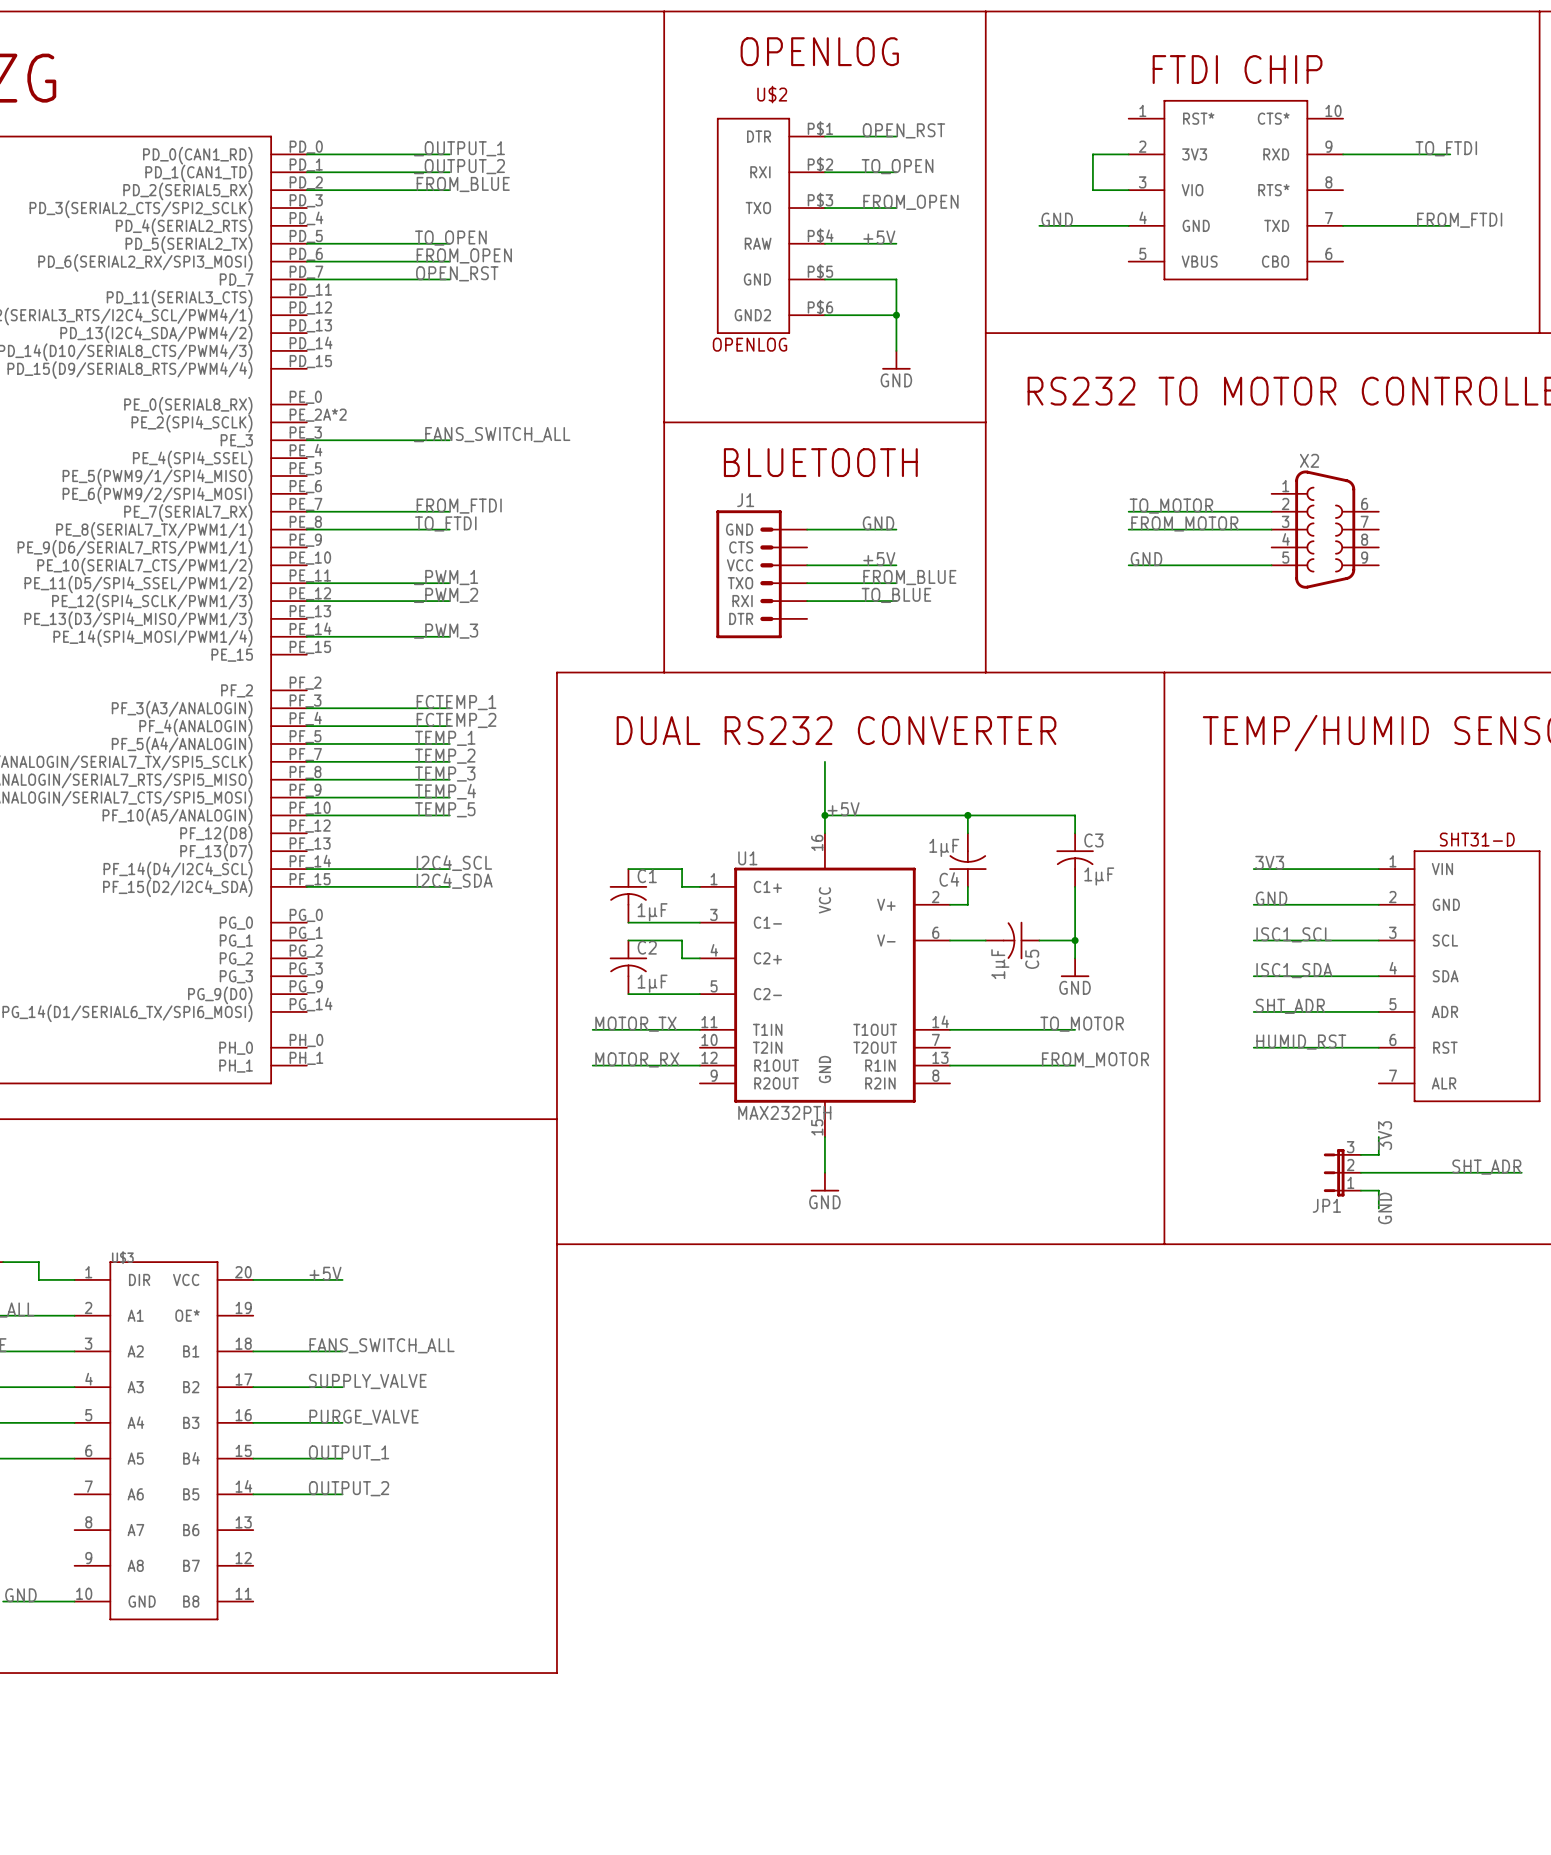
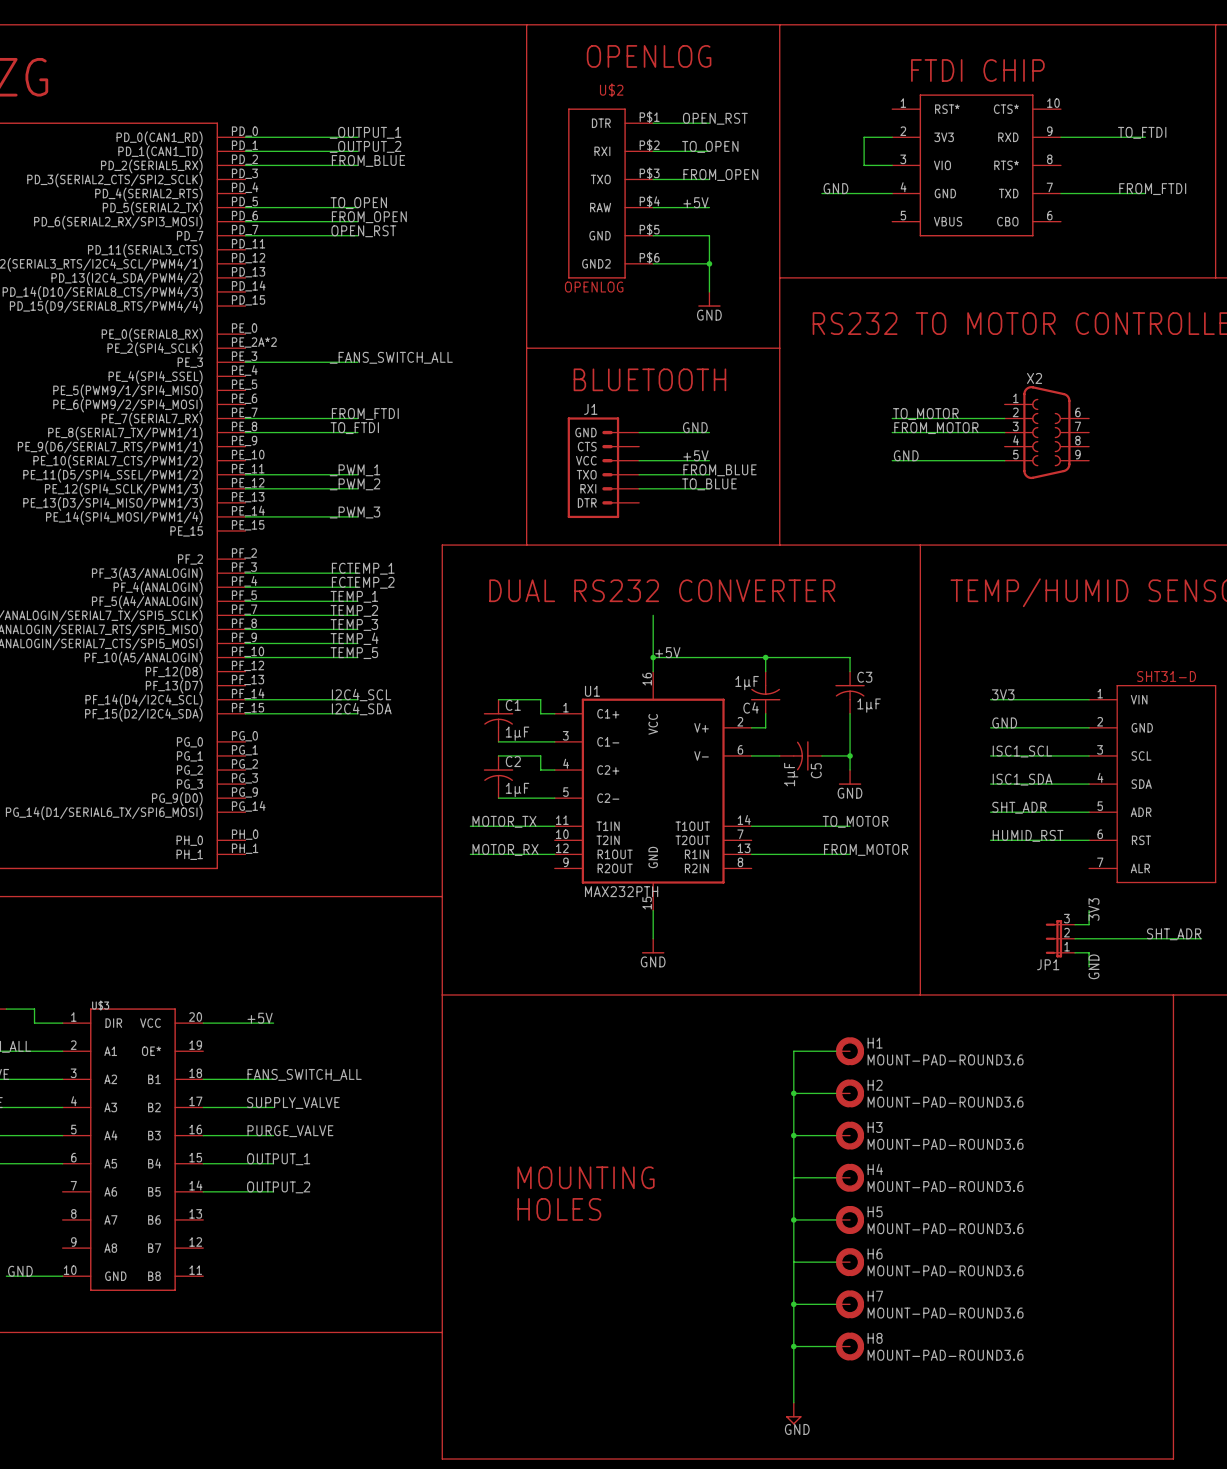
line: none -> (1173, 994) (1173, 1459) (442, 1459) (442, 1332)
wire: none -> (835, 1051) (793, 1051) (793, 1402)
H1: none -> MOUNT-PAD-ROUND3.6 (850, 1051)
wire: none -> (793, 1093) (835, 1093)
junction: none -> (793, 1093)
H2: none -> MOUNT-PAD-ROUND3.6 (850, 1093)
wire: none -> (793, 1135) (835, 1135)
junction: none -> (793, 1135)
H3: none -> MOUNT-PAD-ROUND3.6 (850, 1135)
text: none -> MOUNTING (586, 1177)
wire: none -> (793, 1177) (835, 1177)
H4: none -> MOUNT-PAD-ROUND3.6 (850, 1177)
text: none -> HOLES (559, 1209)
wire: none -> (793, 1219) (835, 1219)
junction: none -> (793, 1219)
H5: none -> MOUNT-PAD-ROUND3.6 (850, 1219)
wire: none -> (793, 1262) (835, 1262)
H6: none -> MOUNT-PAD-ROUND3.6 (850, 1262)
wire: none -> (793, 1304) (835, 1304)
junction: none -> (793, 1304)
H7: none -> MOUNT-PAD-ROUND3.6 (850, 1304)
wire: none -> (793, 1346) (835, 1346)
junction: none -> (793, 1346)
H8: none -> MOUNT-PAD-ROUND3.6 (850, 1346)
power symbol: none -> GND (793, 1413)

